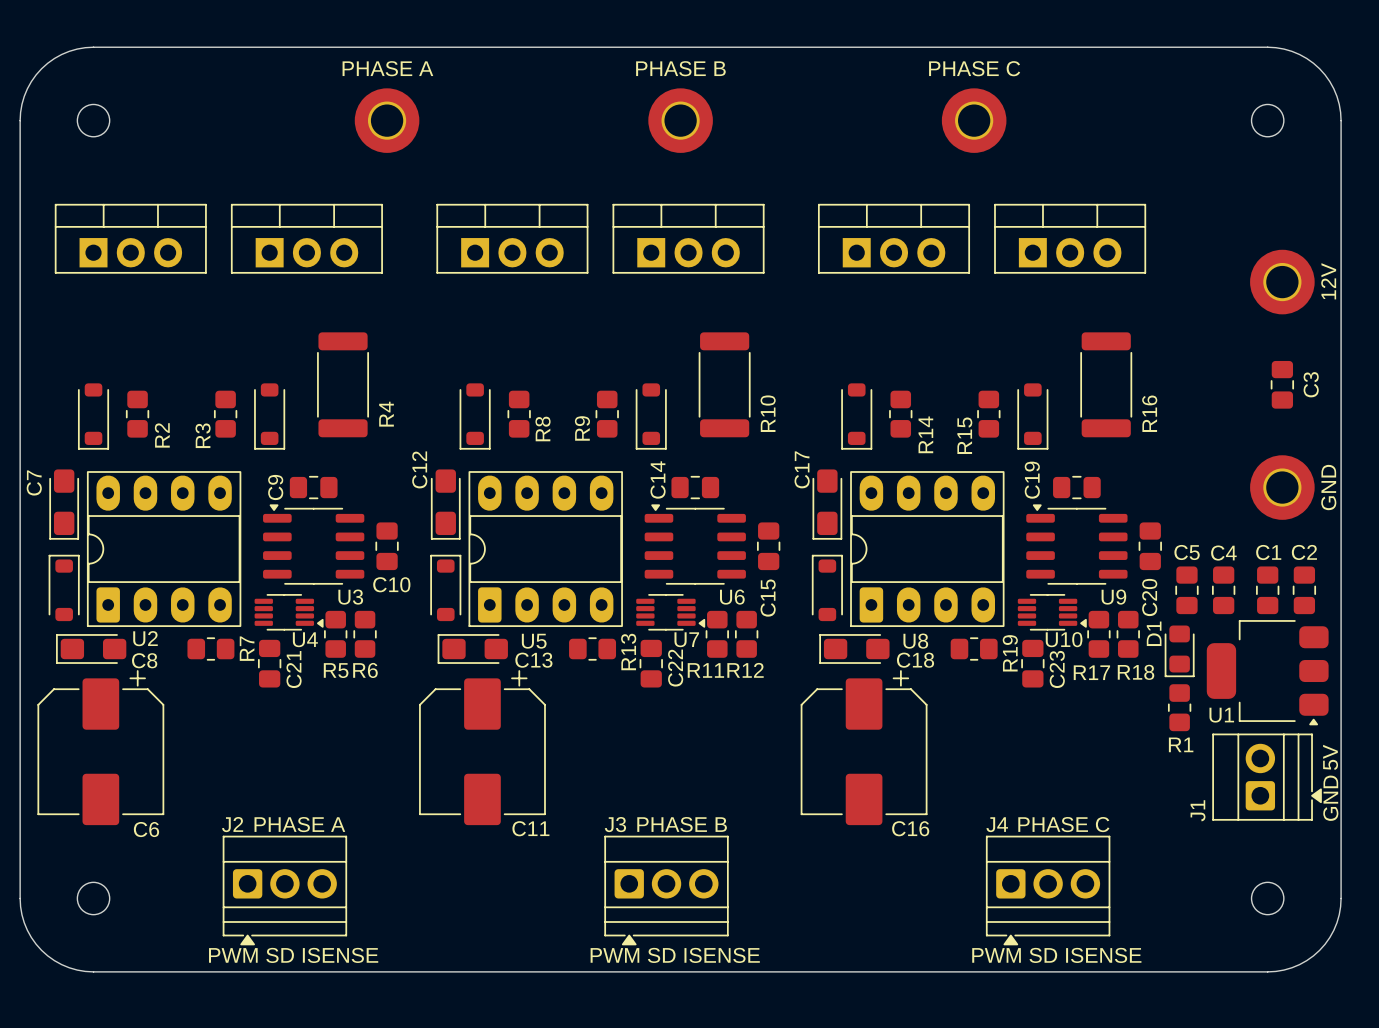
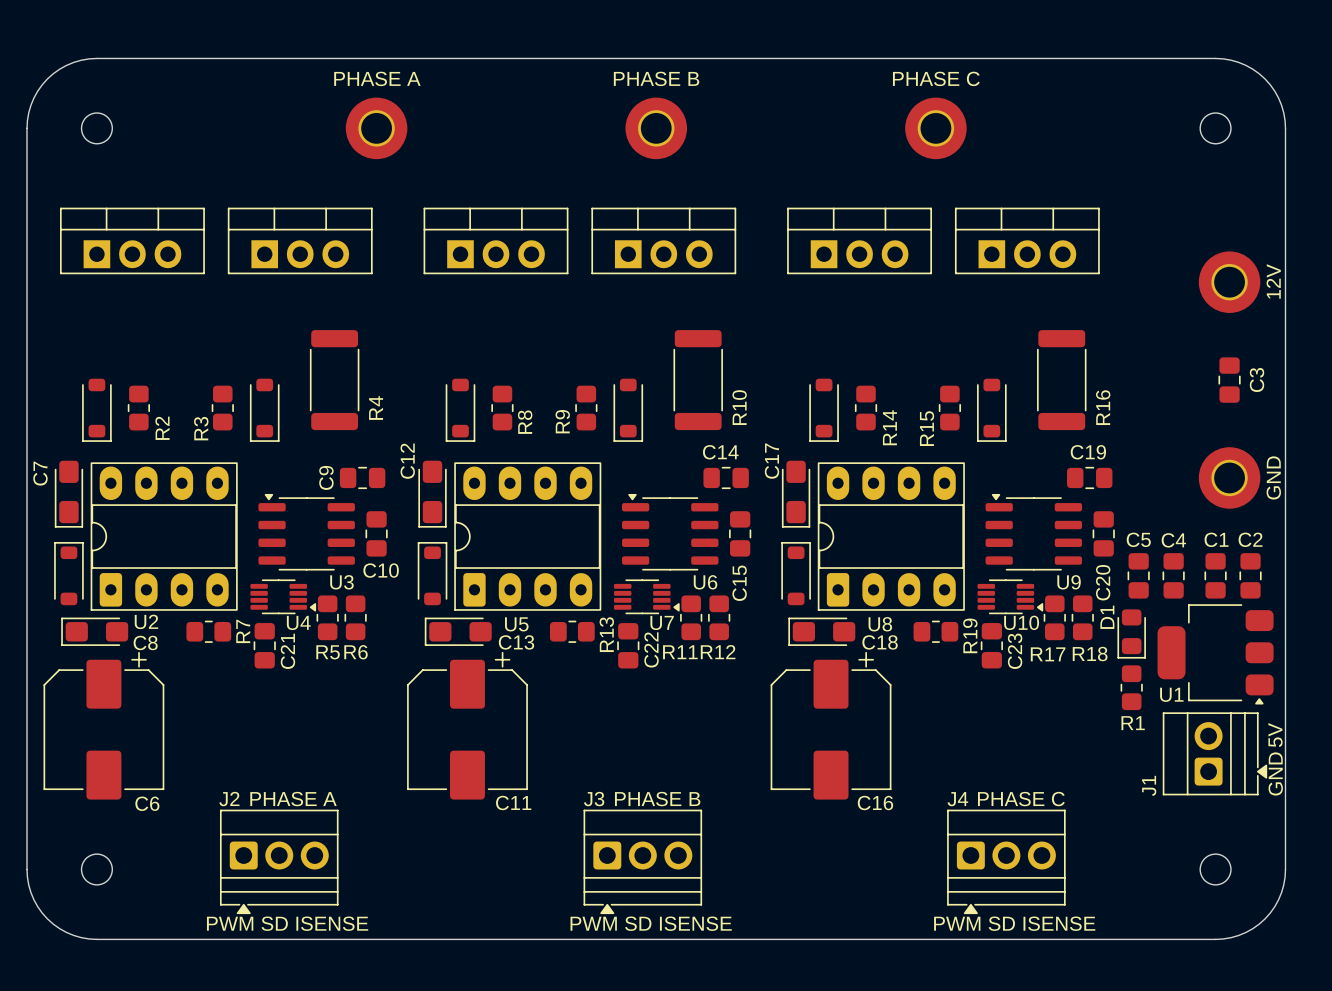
C14 name rotation: 0° (658, 479) -> 90° clockwise (720, 452)
C19 name rotation: 0° (1032, 480) -> 90° clockwise (1088, 452)
C9 position: (313, 487) -> (362, 477)
C14 position: (695, 487) -> (726, 477)
C19 position: (1076, 487) -> (1089, 477)

